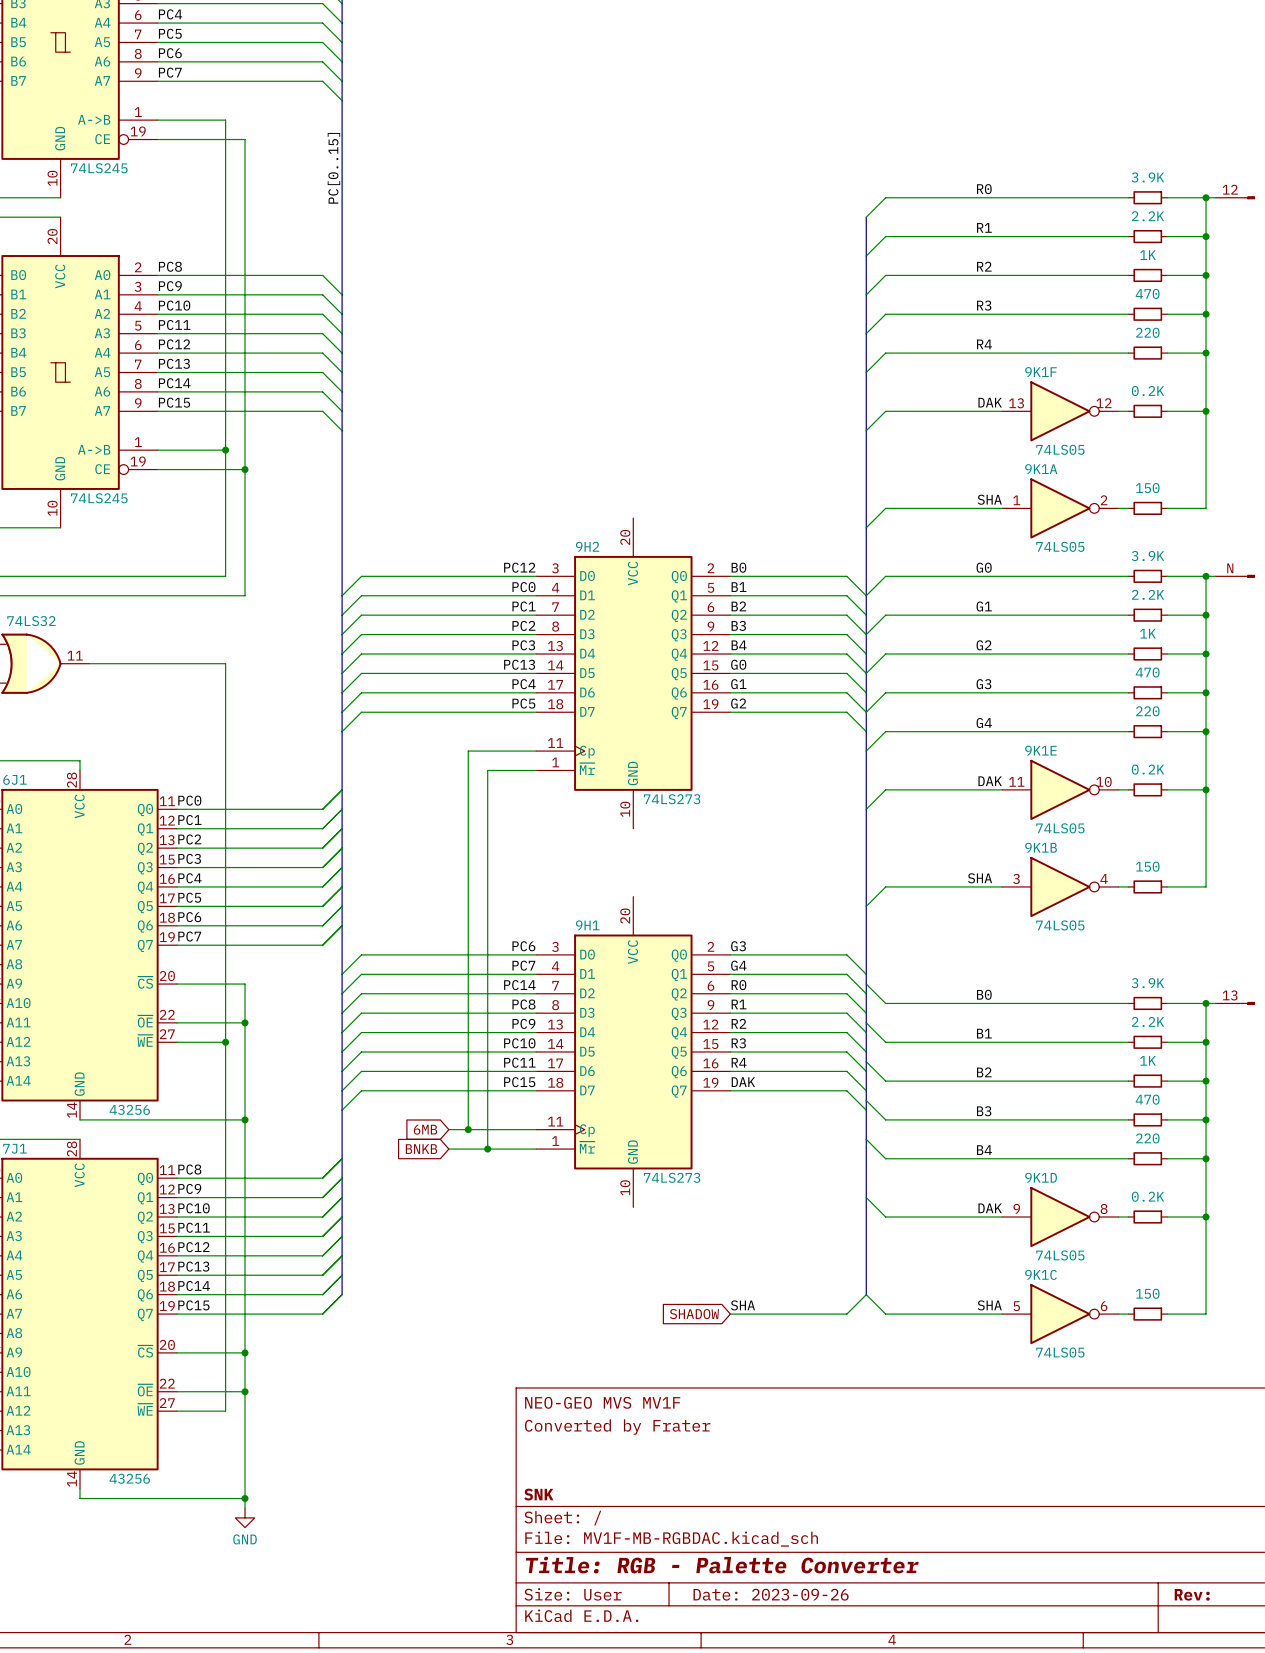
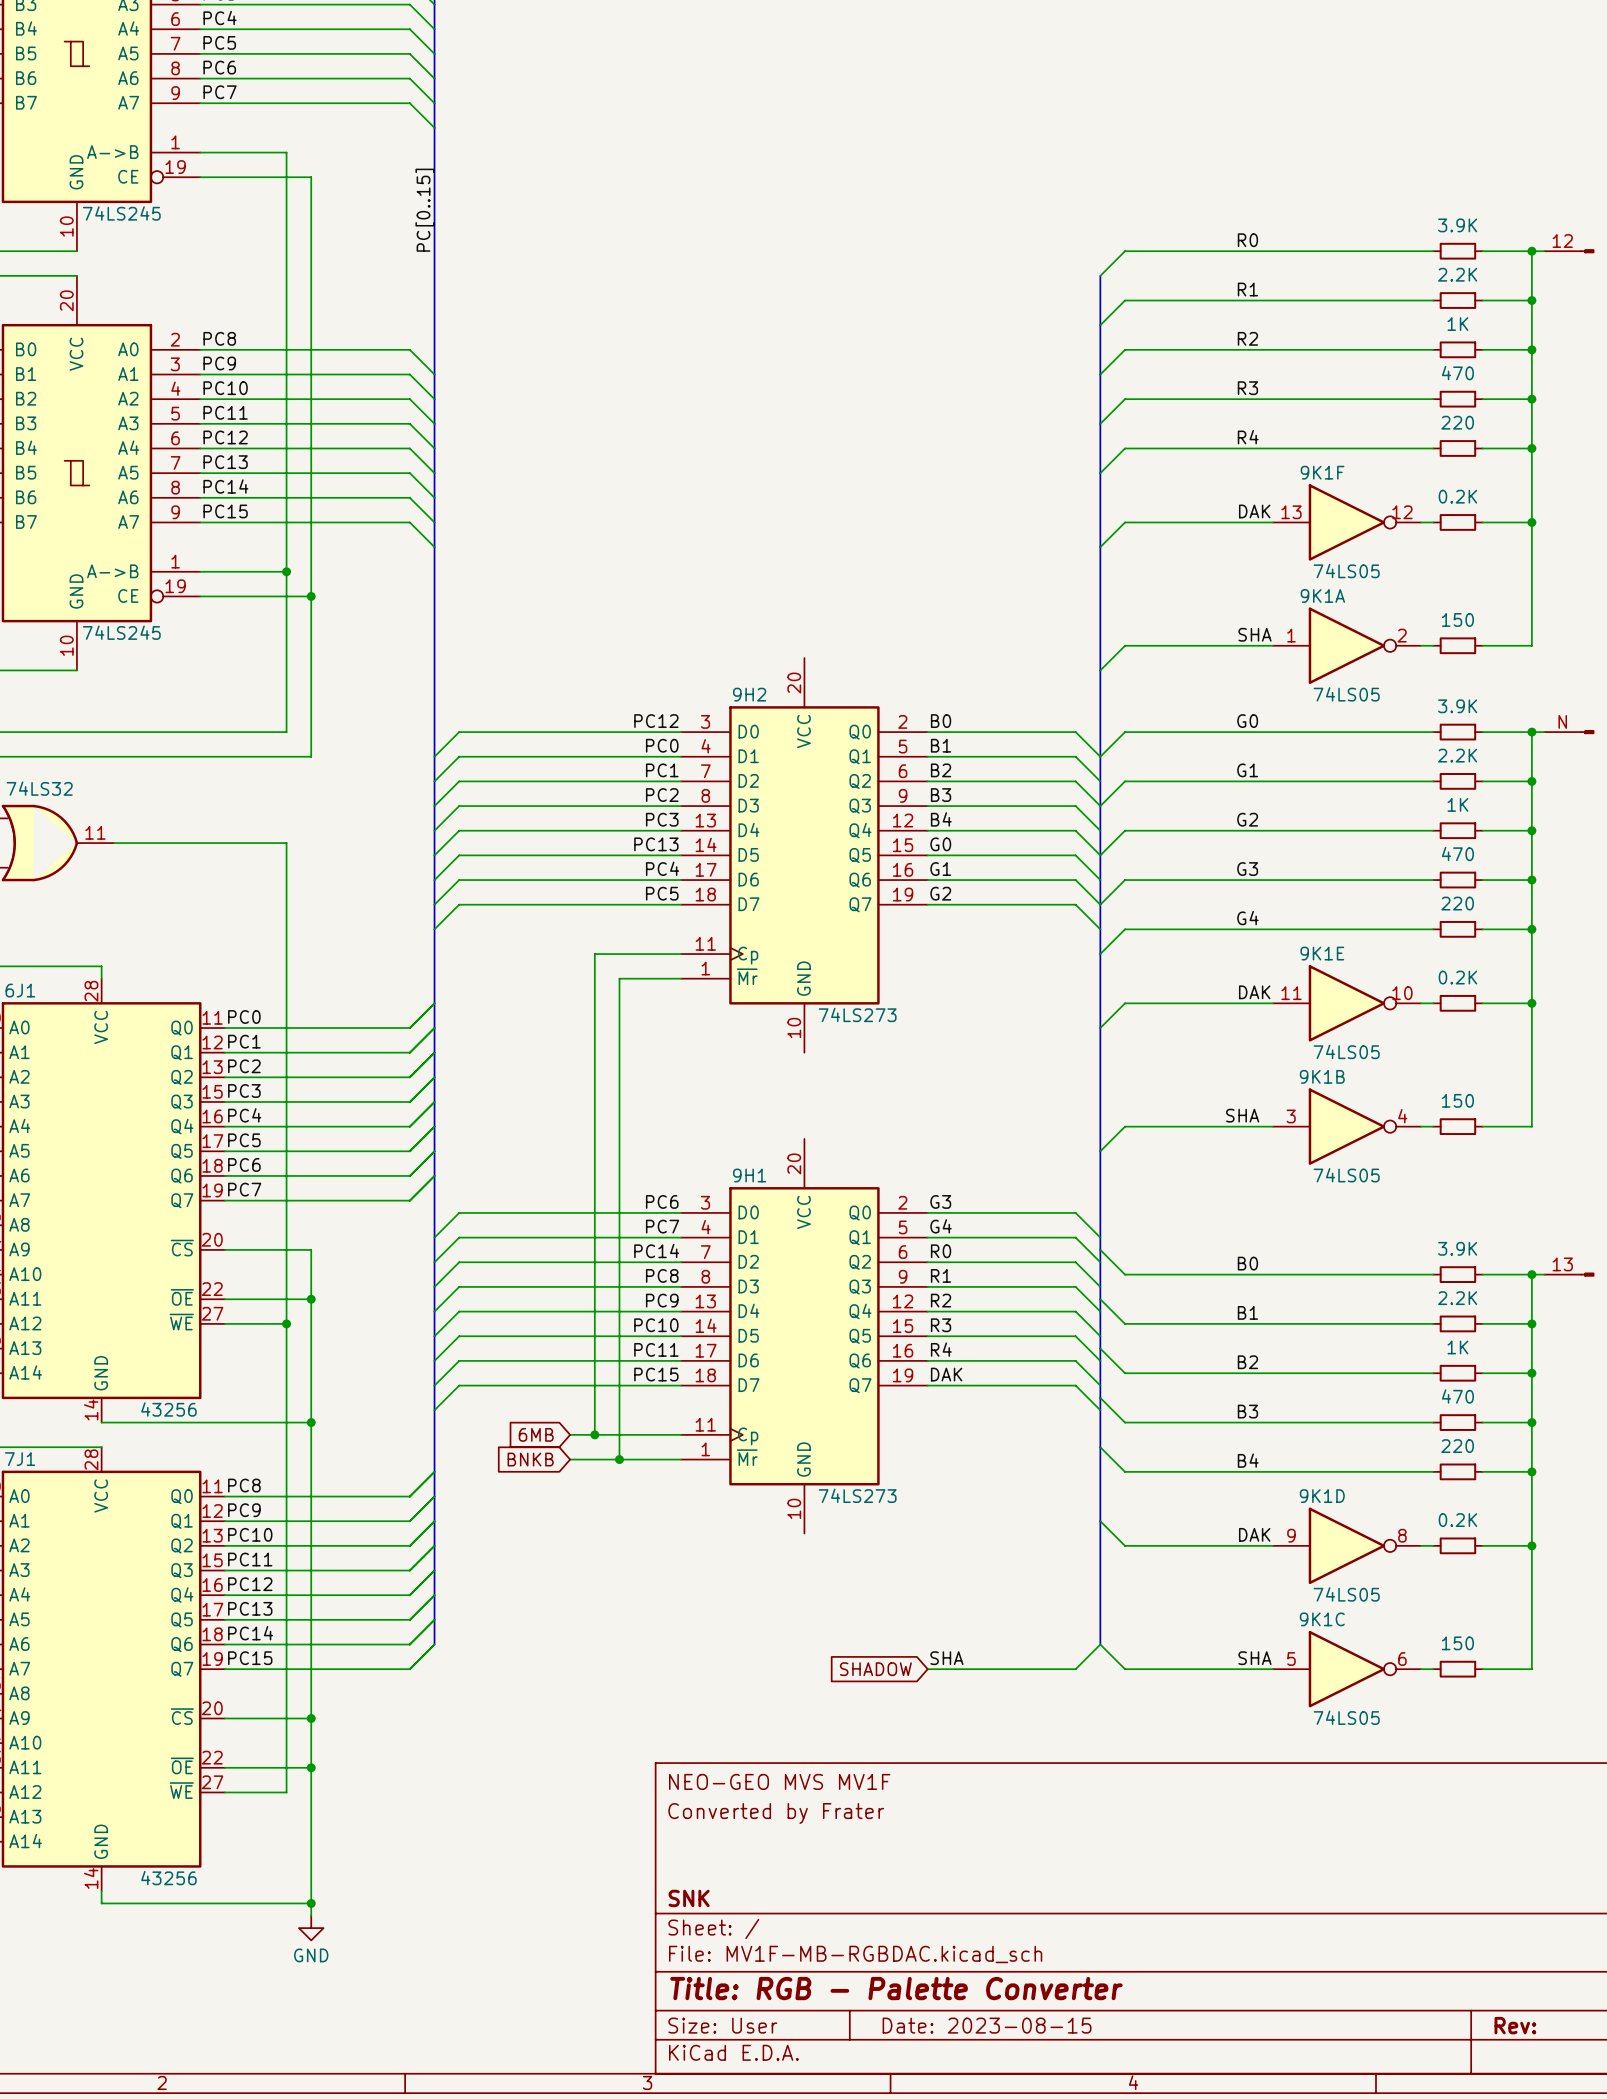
title block: Date: 2023-09-26 (771, 1594) -> Date: 2023-08-15 (987, 2025)

